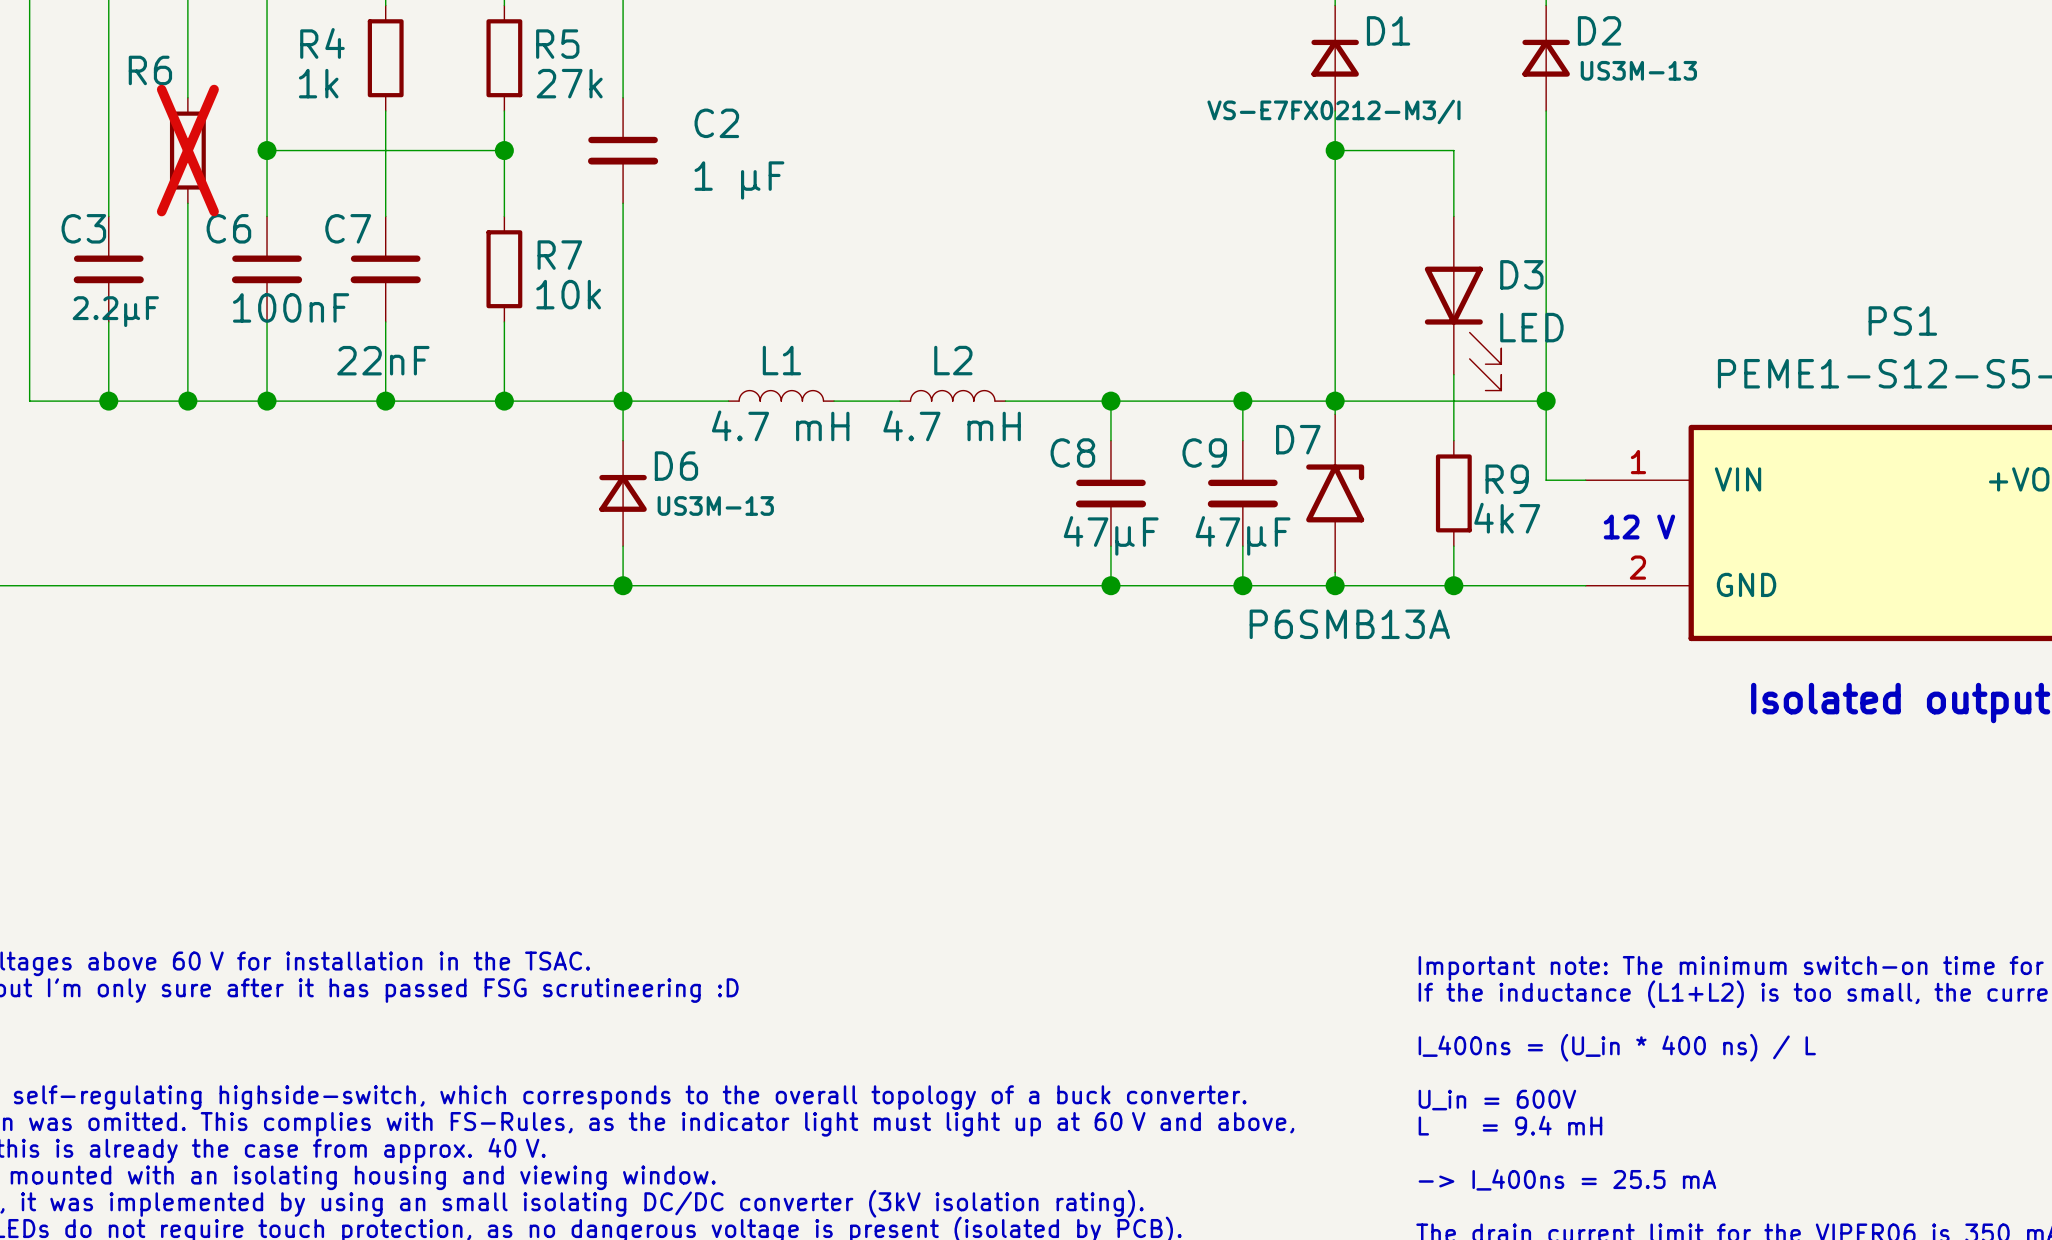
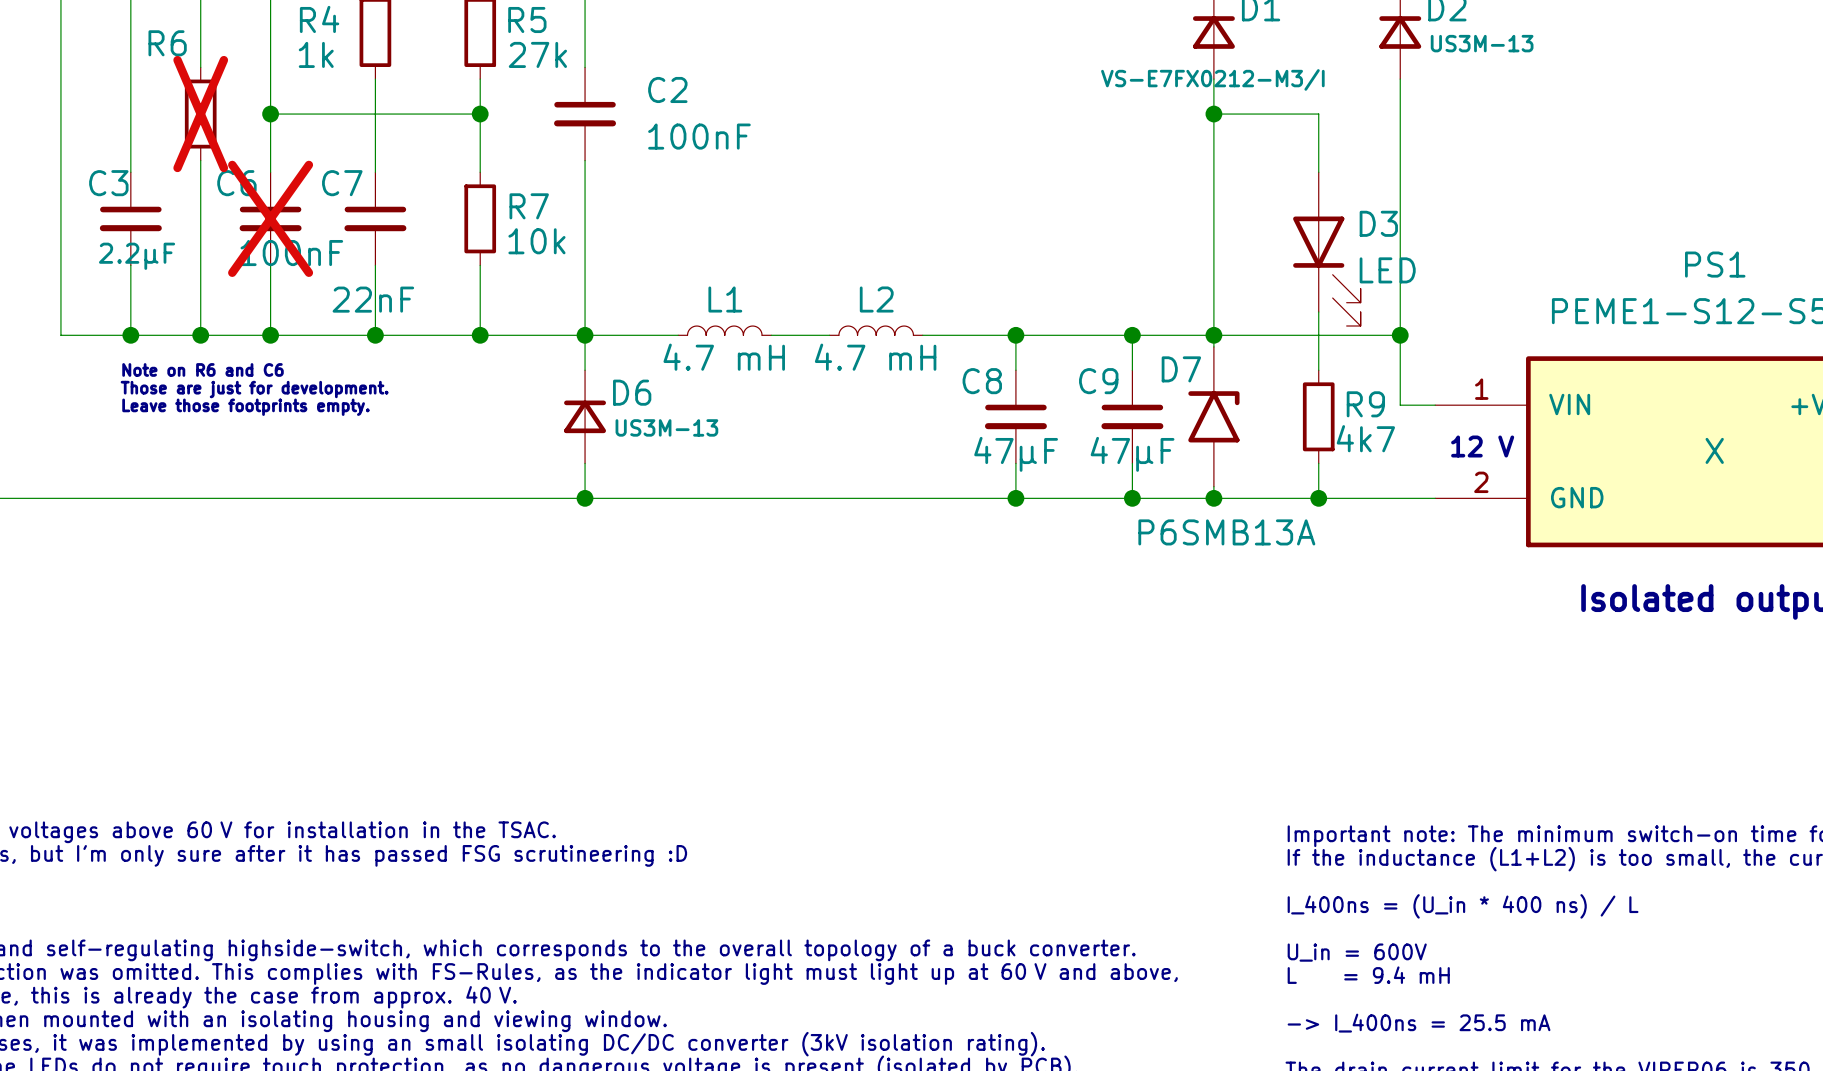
C2 value: 1 µF (739, 180) -> 100nF (699, 136)
C6 do-not-place cross: none -> (270, 218)
text: none -> Note on R6 and C6 (203, 369)
text: none -> Those are just for development. (254, 389)
text: none -> Leave those footprints empty. (245, 407)
PS1 text: none -> X (1714, 450)

